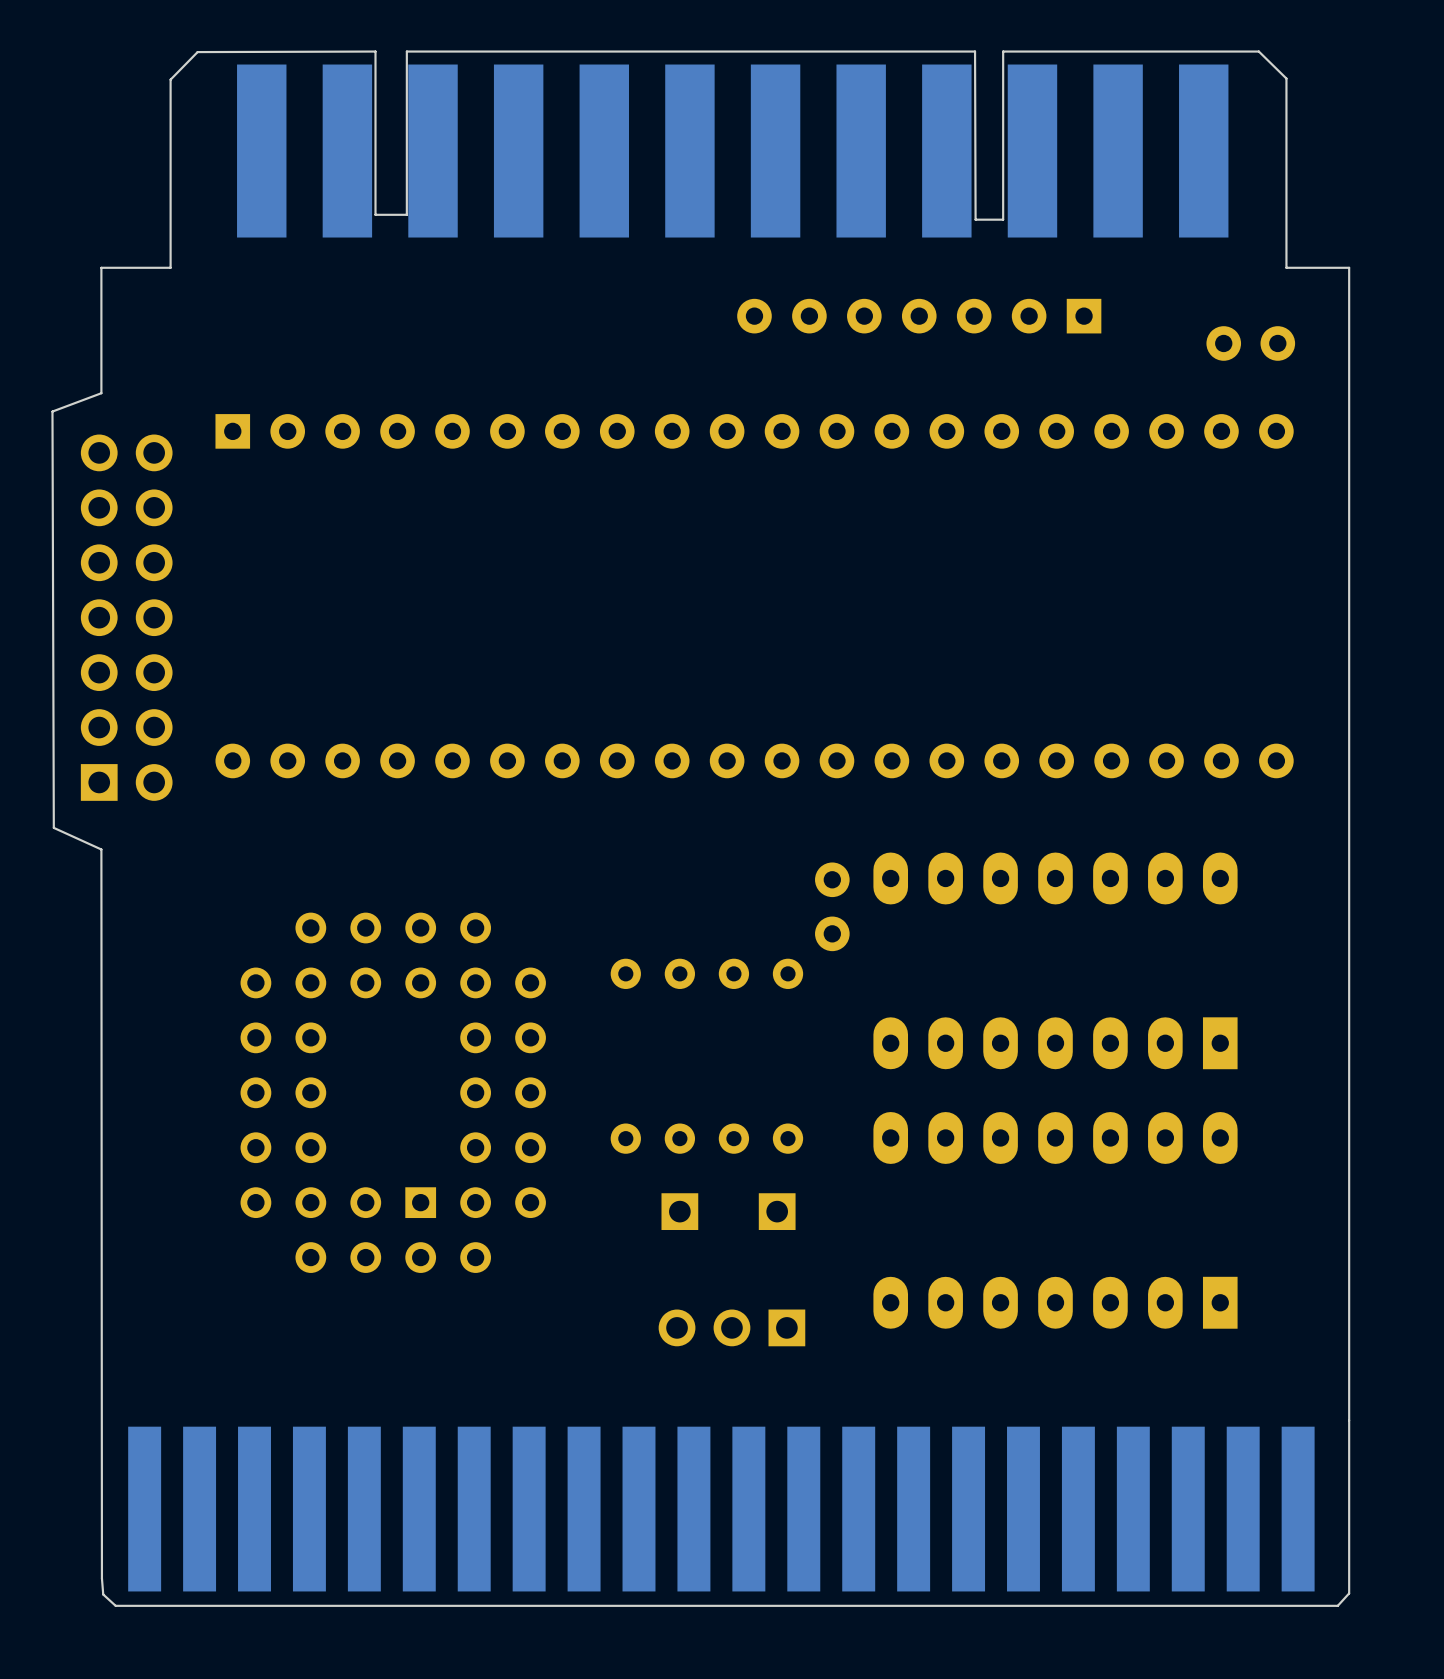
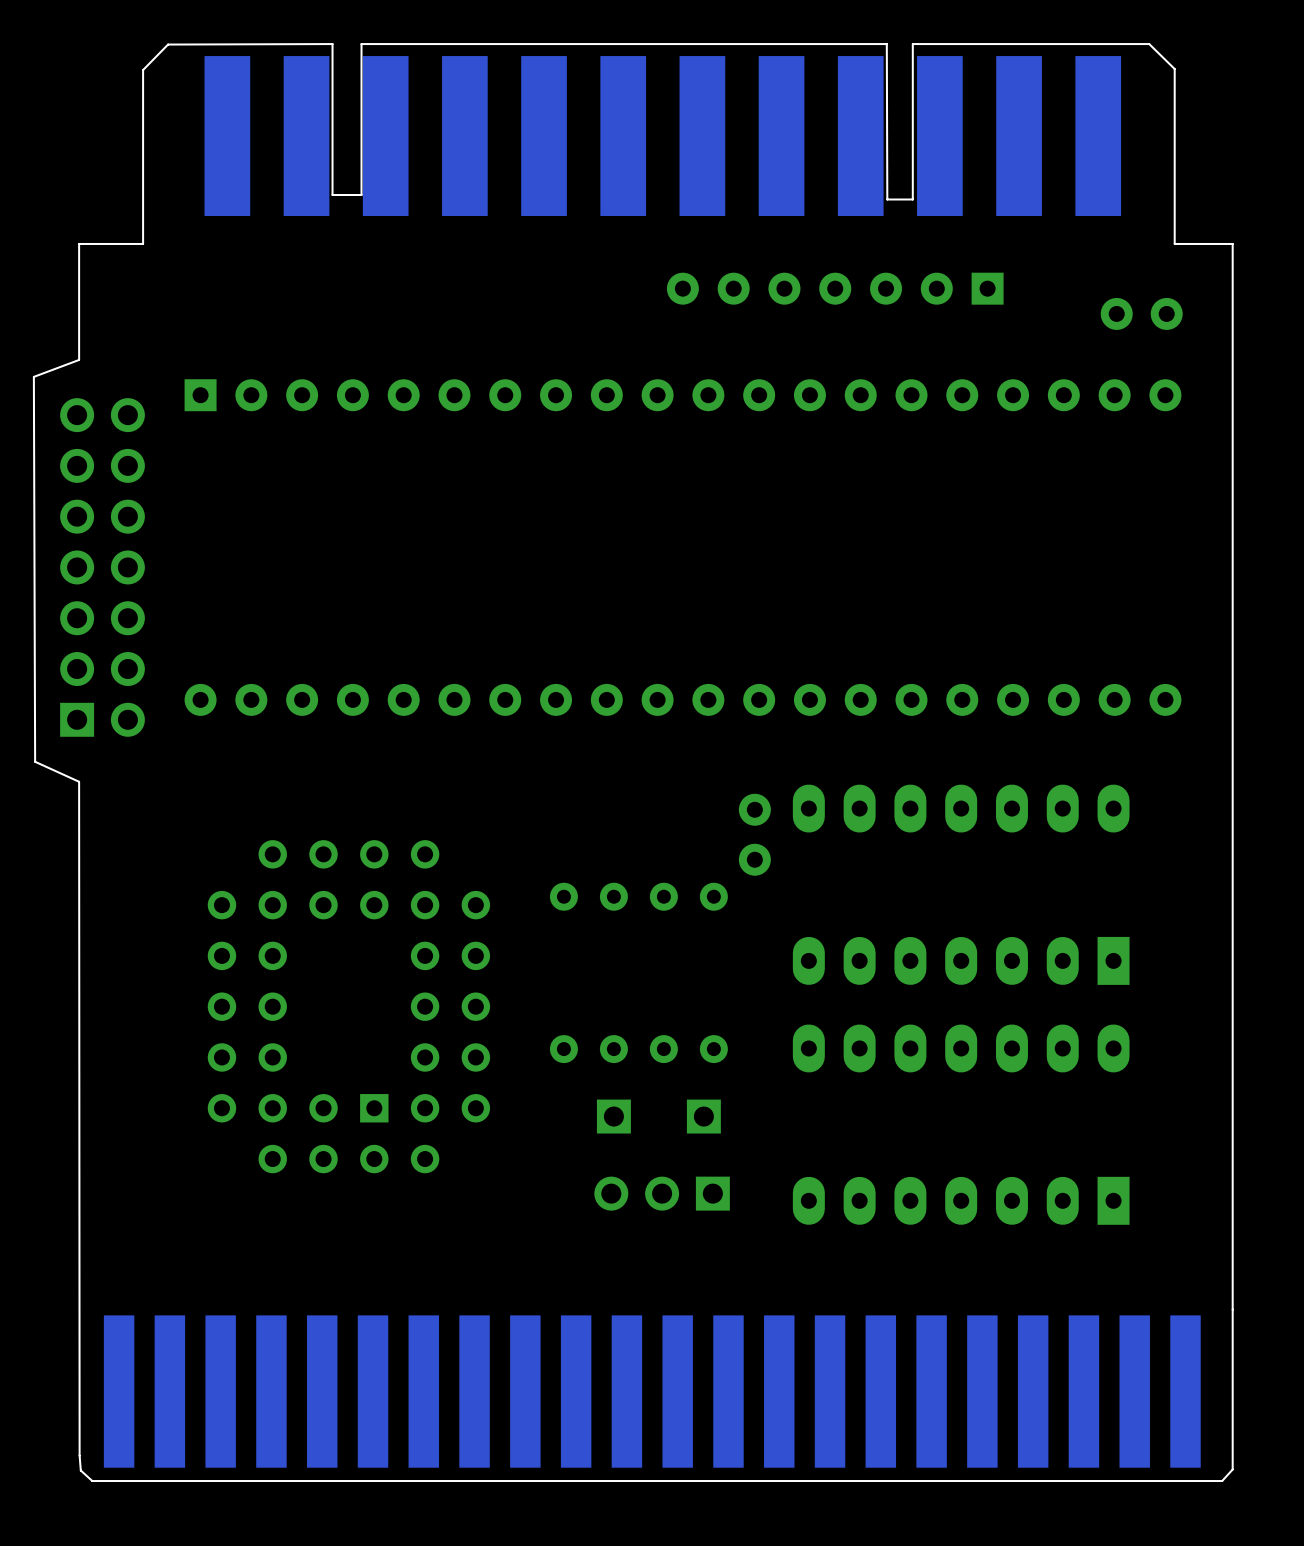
part position: (731, 1327) -> (662, 1193)

